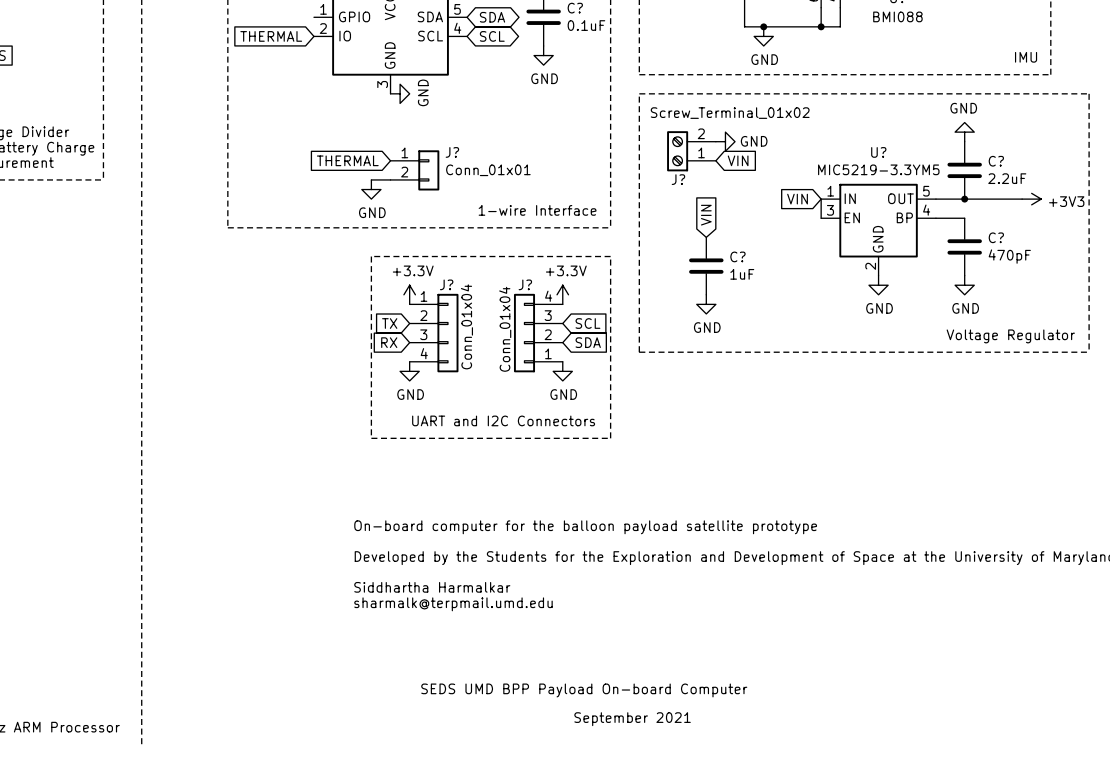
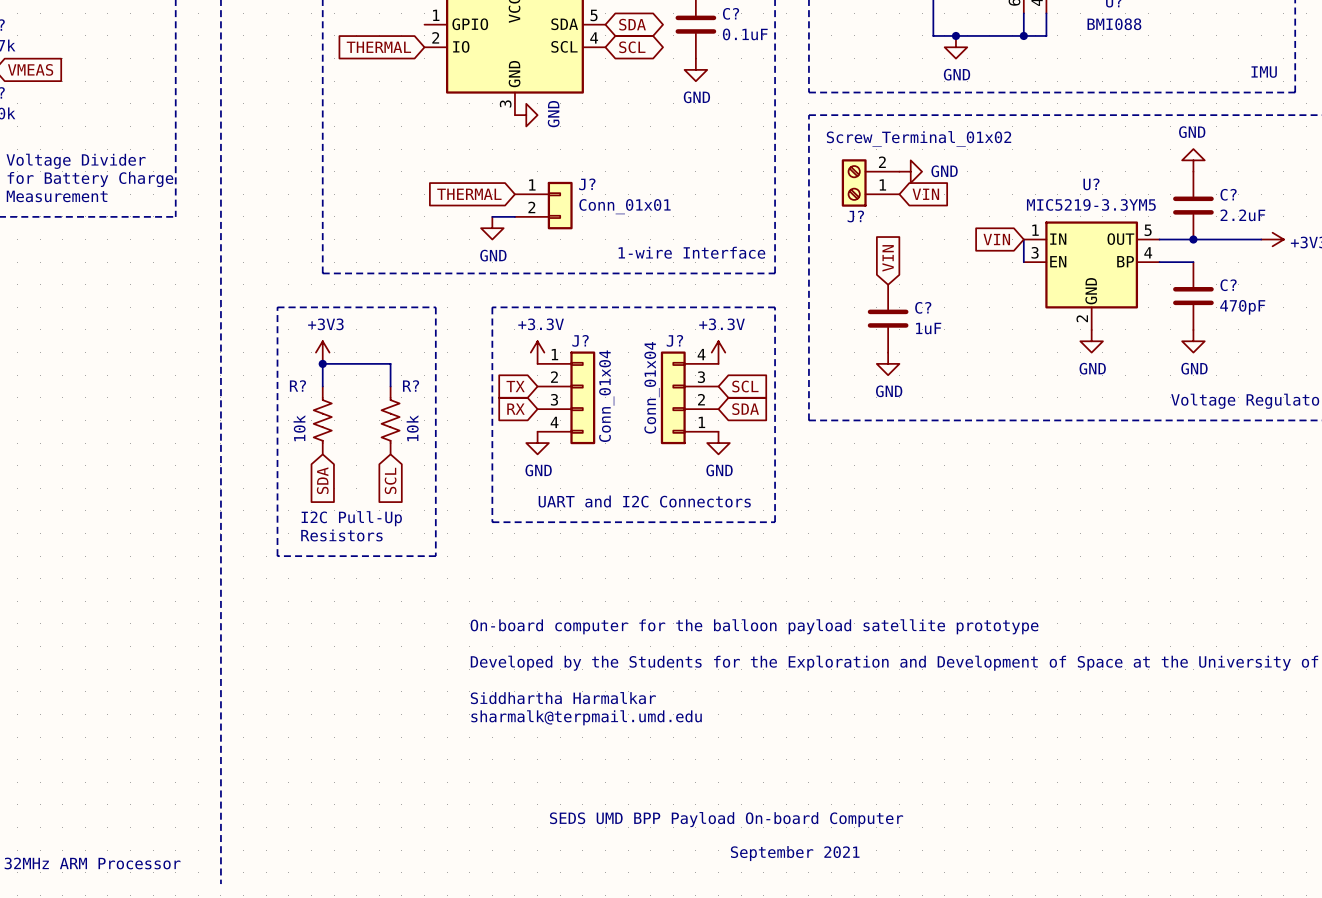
line: none -> (277, 307) (277, 556) (435, 556) (435, 307) (277, 307)
power symbol: none -> +3V3 (322, 352)
junction: none -> (322, 363)
wire: none -> (322, 386) (322, 363) (390, 363) (390, 386)
R?: none -> 10k (322, 420)
R?: none -> 10k (390, 420)
global label: none -> SDA (322, 480)
global label: none -> SCL (390, 480)
text: none -> I2C Pull-Up (351, 518)
text: none -> Resistors (341, 535)

